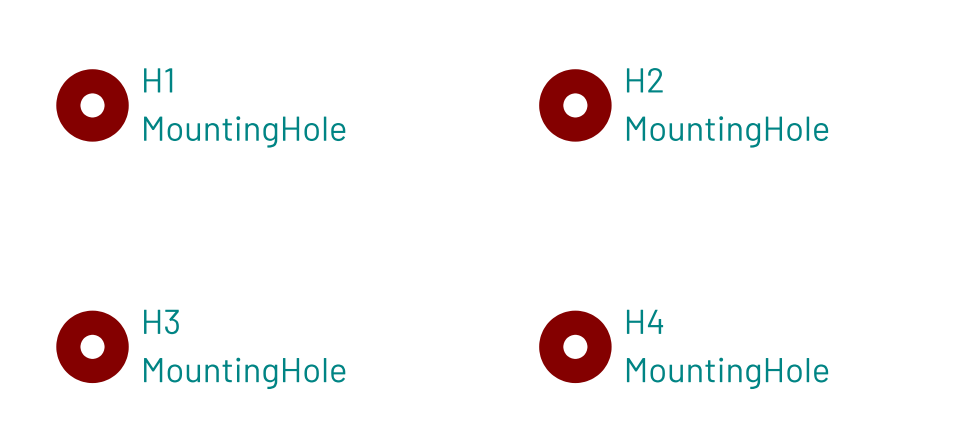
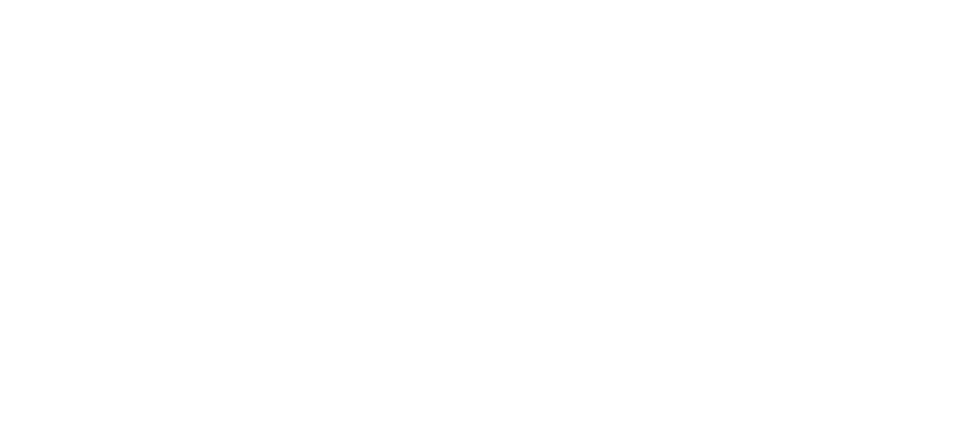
H1: MountingHole (92, 105) -> none
H2: MountingHole (575, 105) -> none
H3: MountingHole (92, 346) -> none
H4: MountingHole (575, 346) -> none

